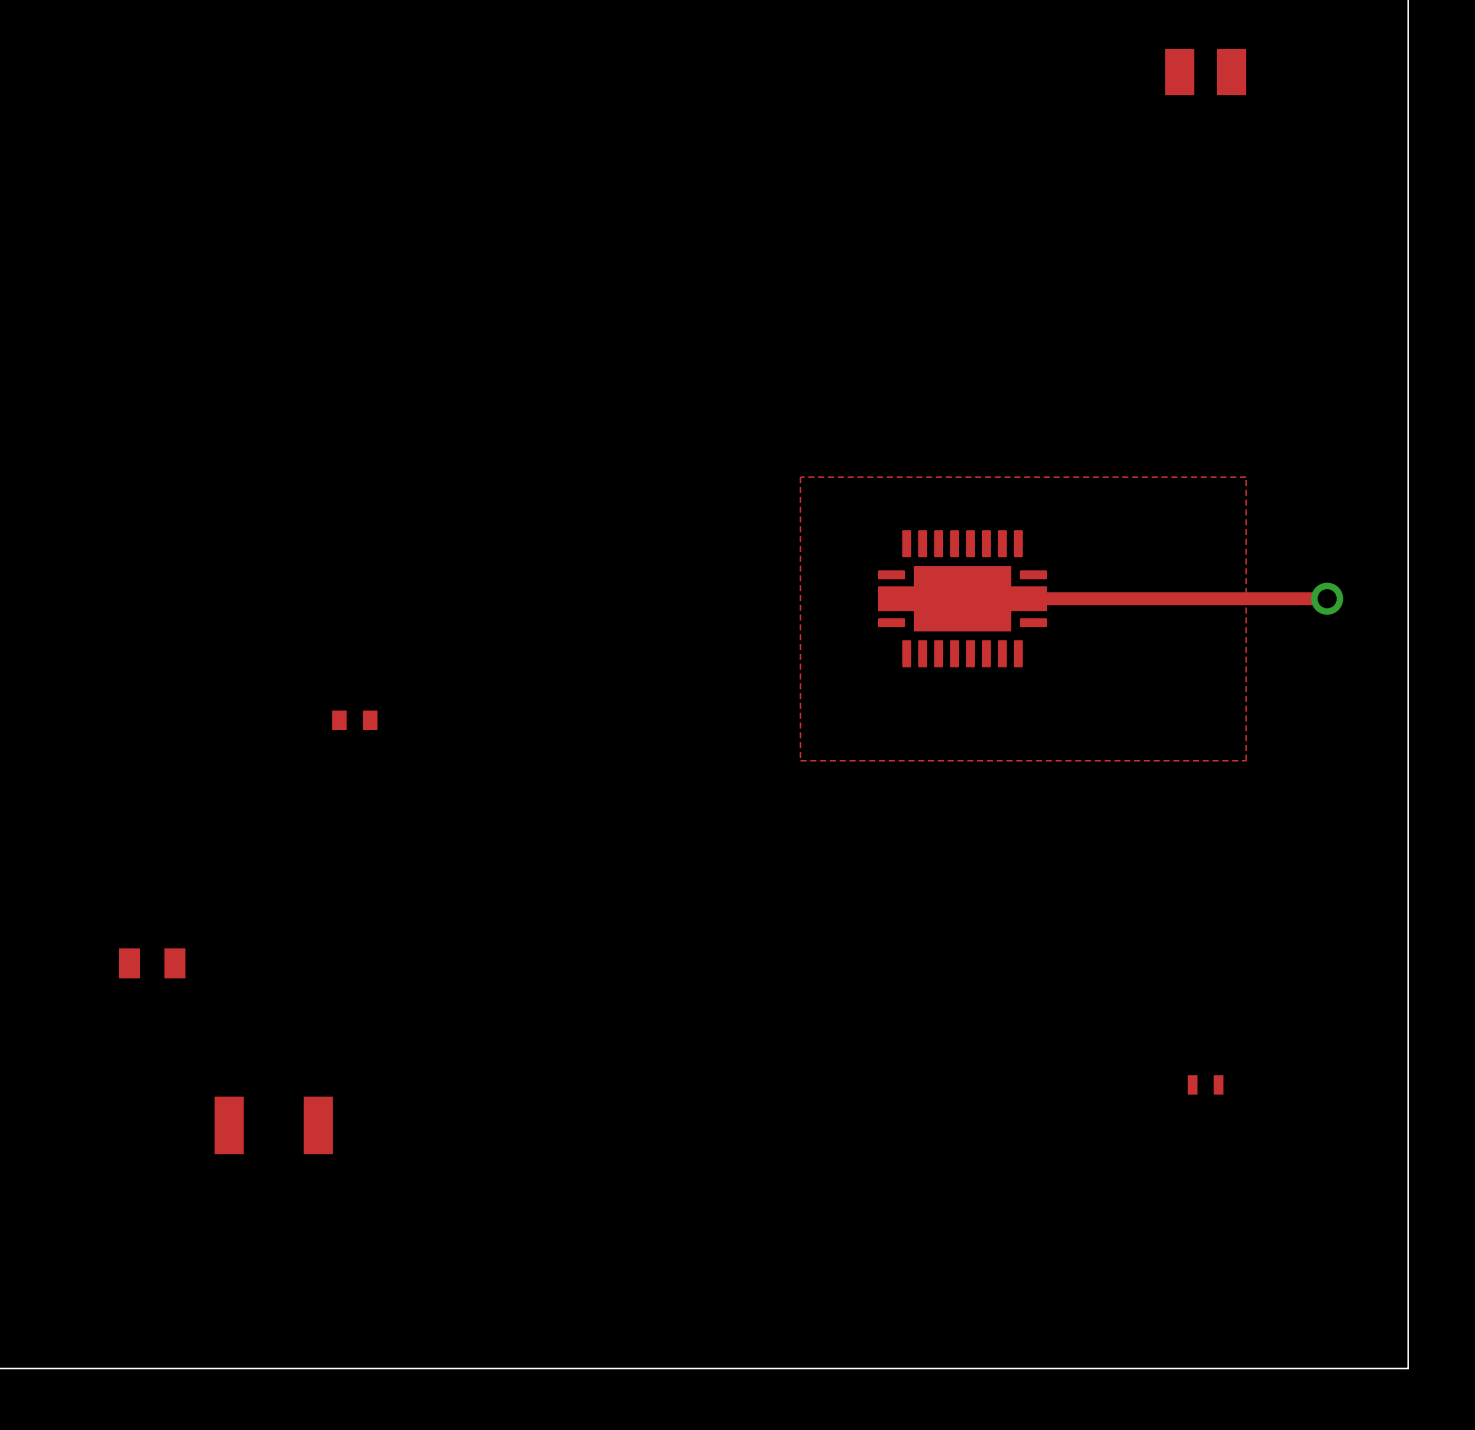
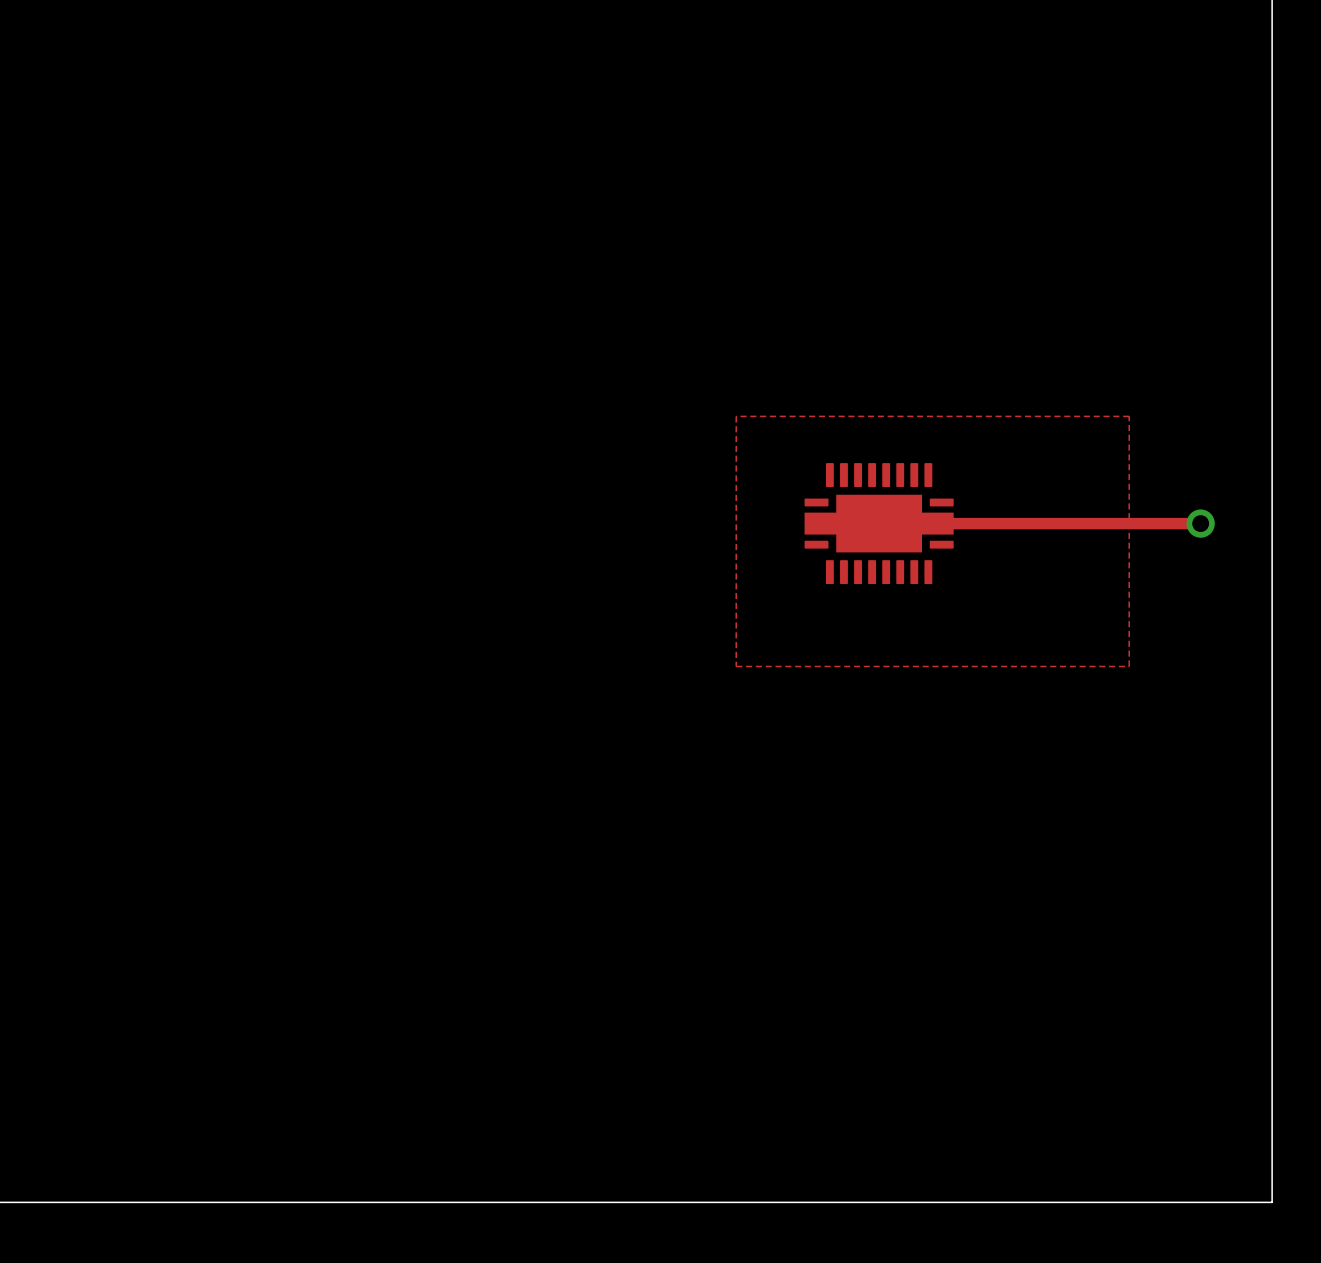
part: (1205, 72) -> none
part: (354, 720) -> none
part: (152, 963) -> none
part: (1205, 1084) -> none
part: (273, 1125) -> none

